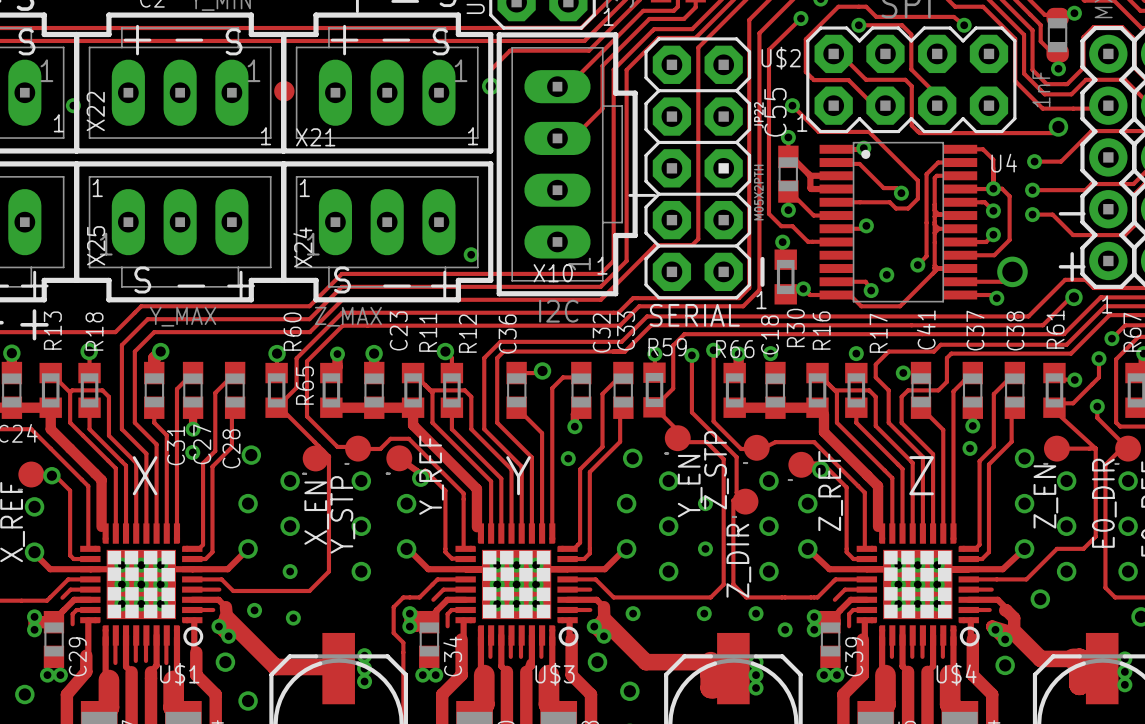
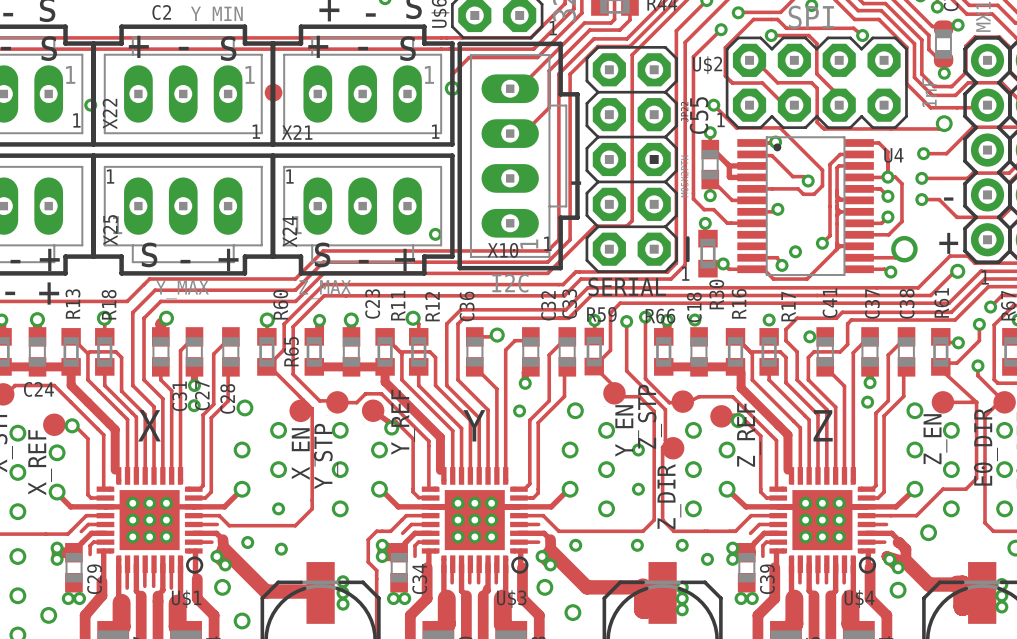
U$1 footprint: [80, 523, 204, 647] -> [96, 467, 204, 574]
U$3 footprint: [455, 523, 579, 647] -> [421, 467, 529, 574]
U$4 footprint: [856, 523, 980, 647] -> [769, 467, 877, 574]

